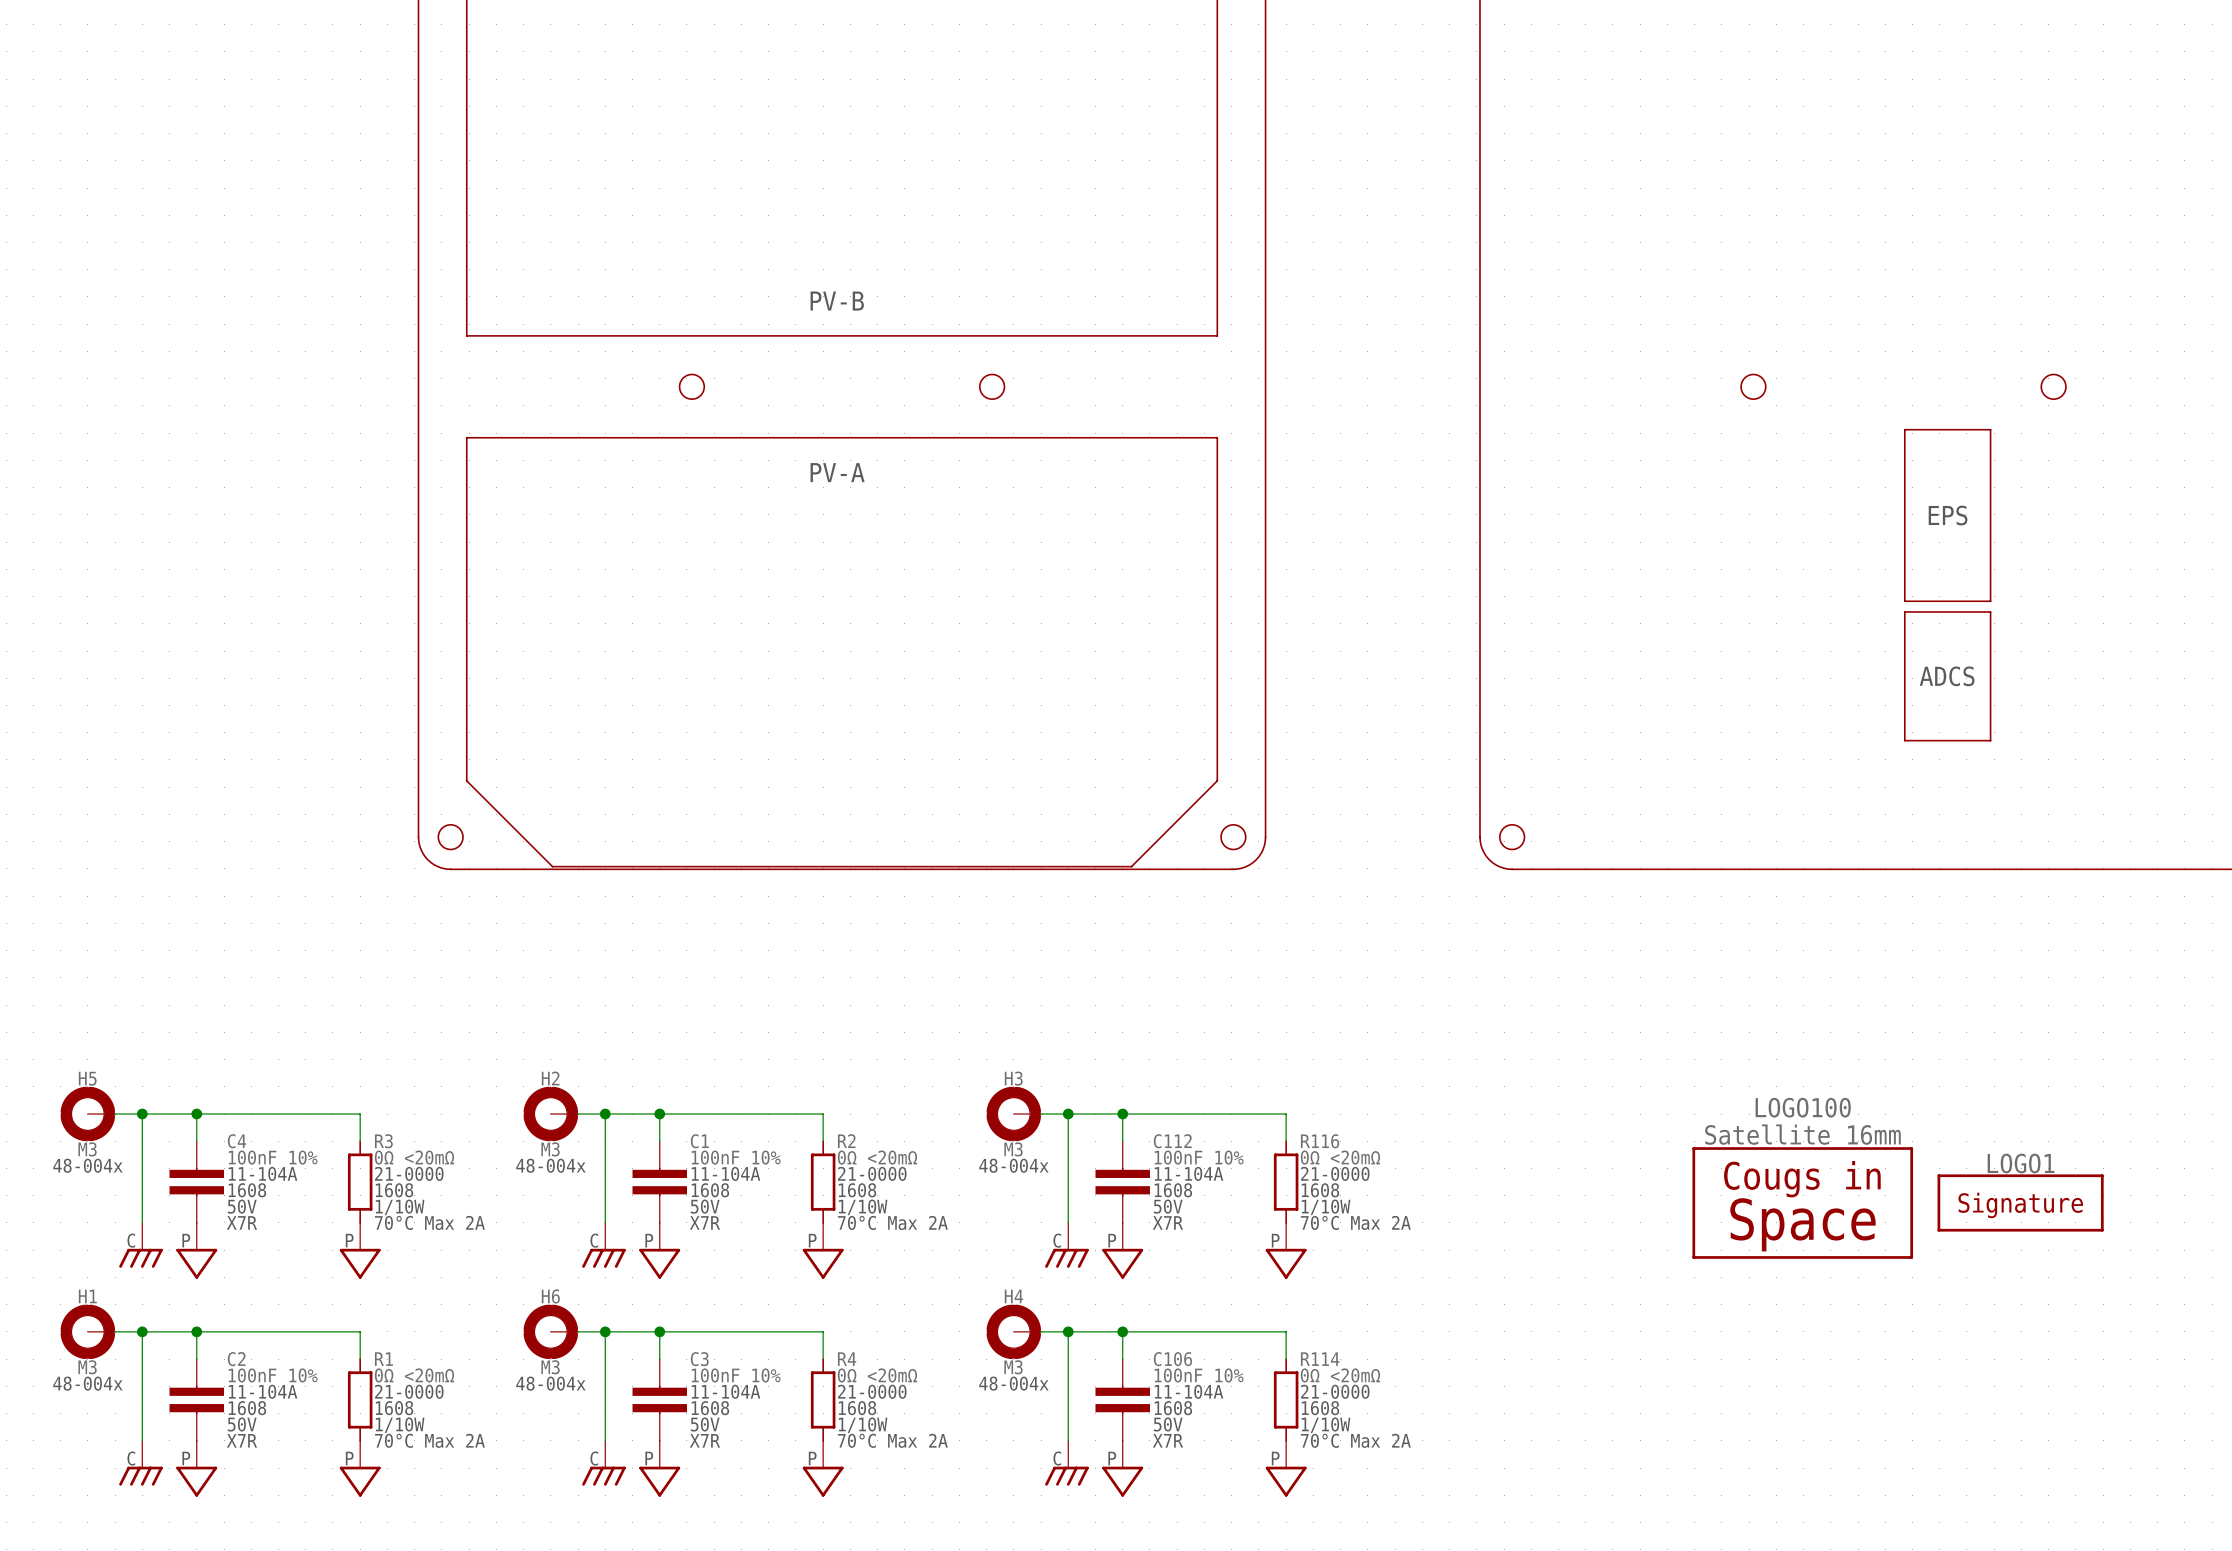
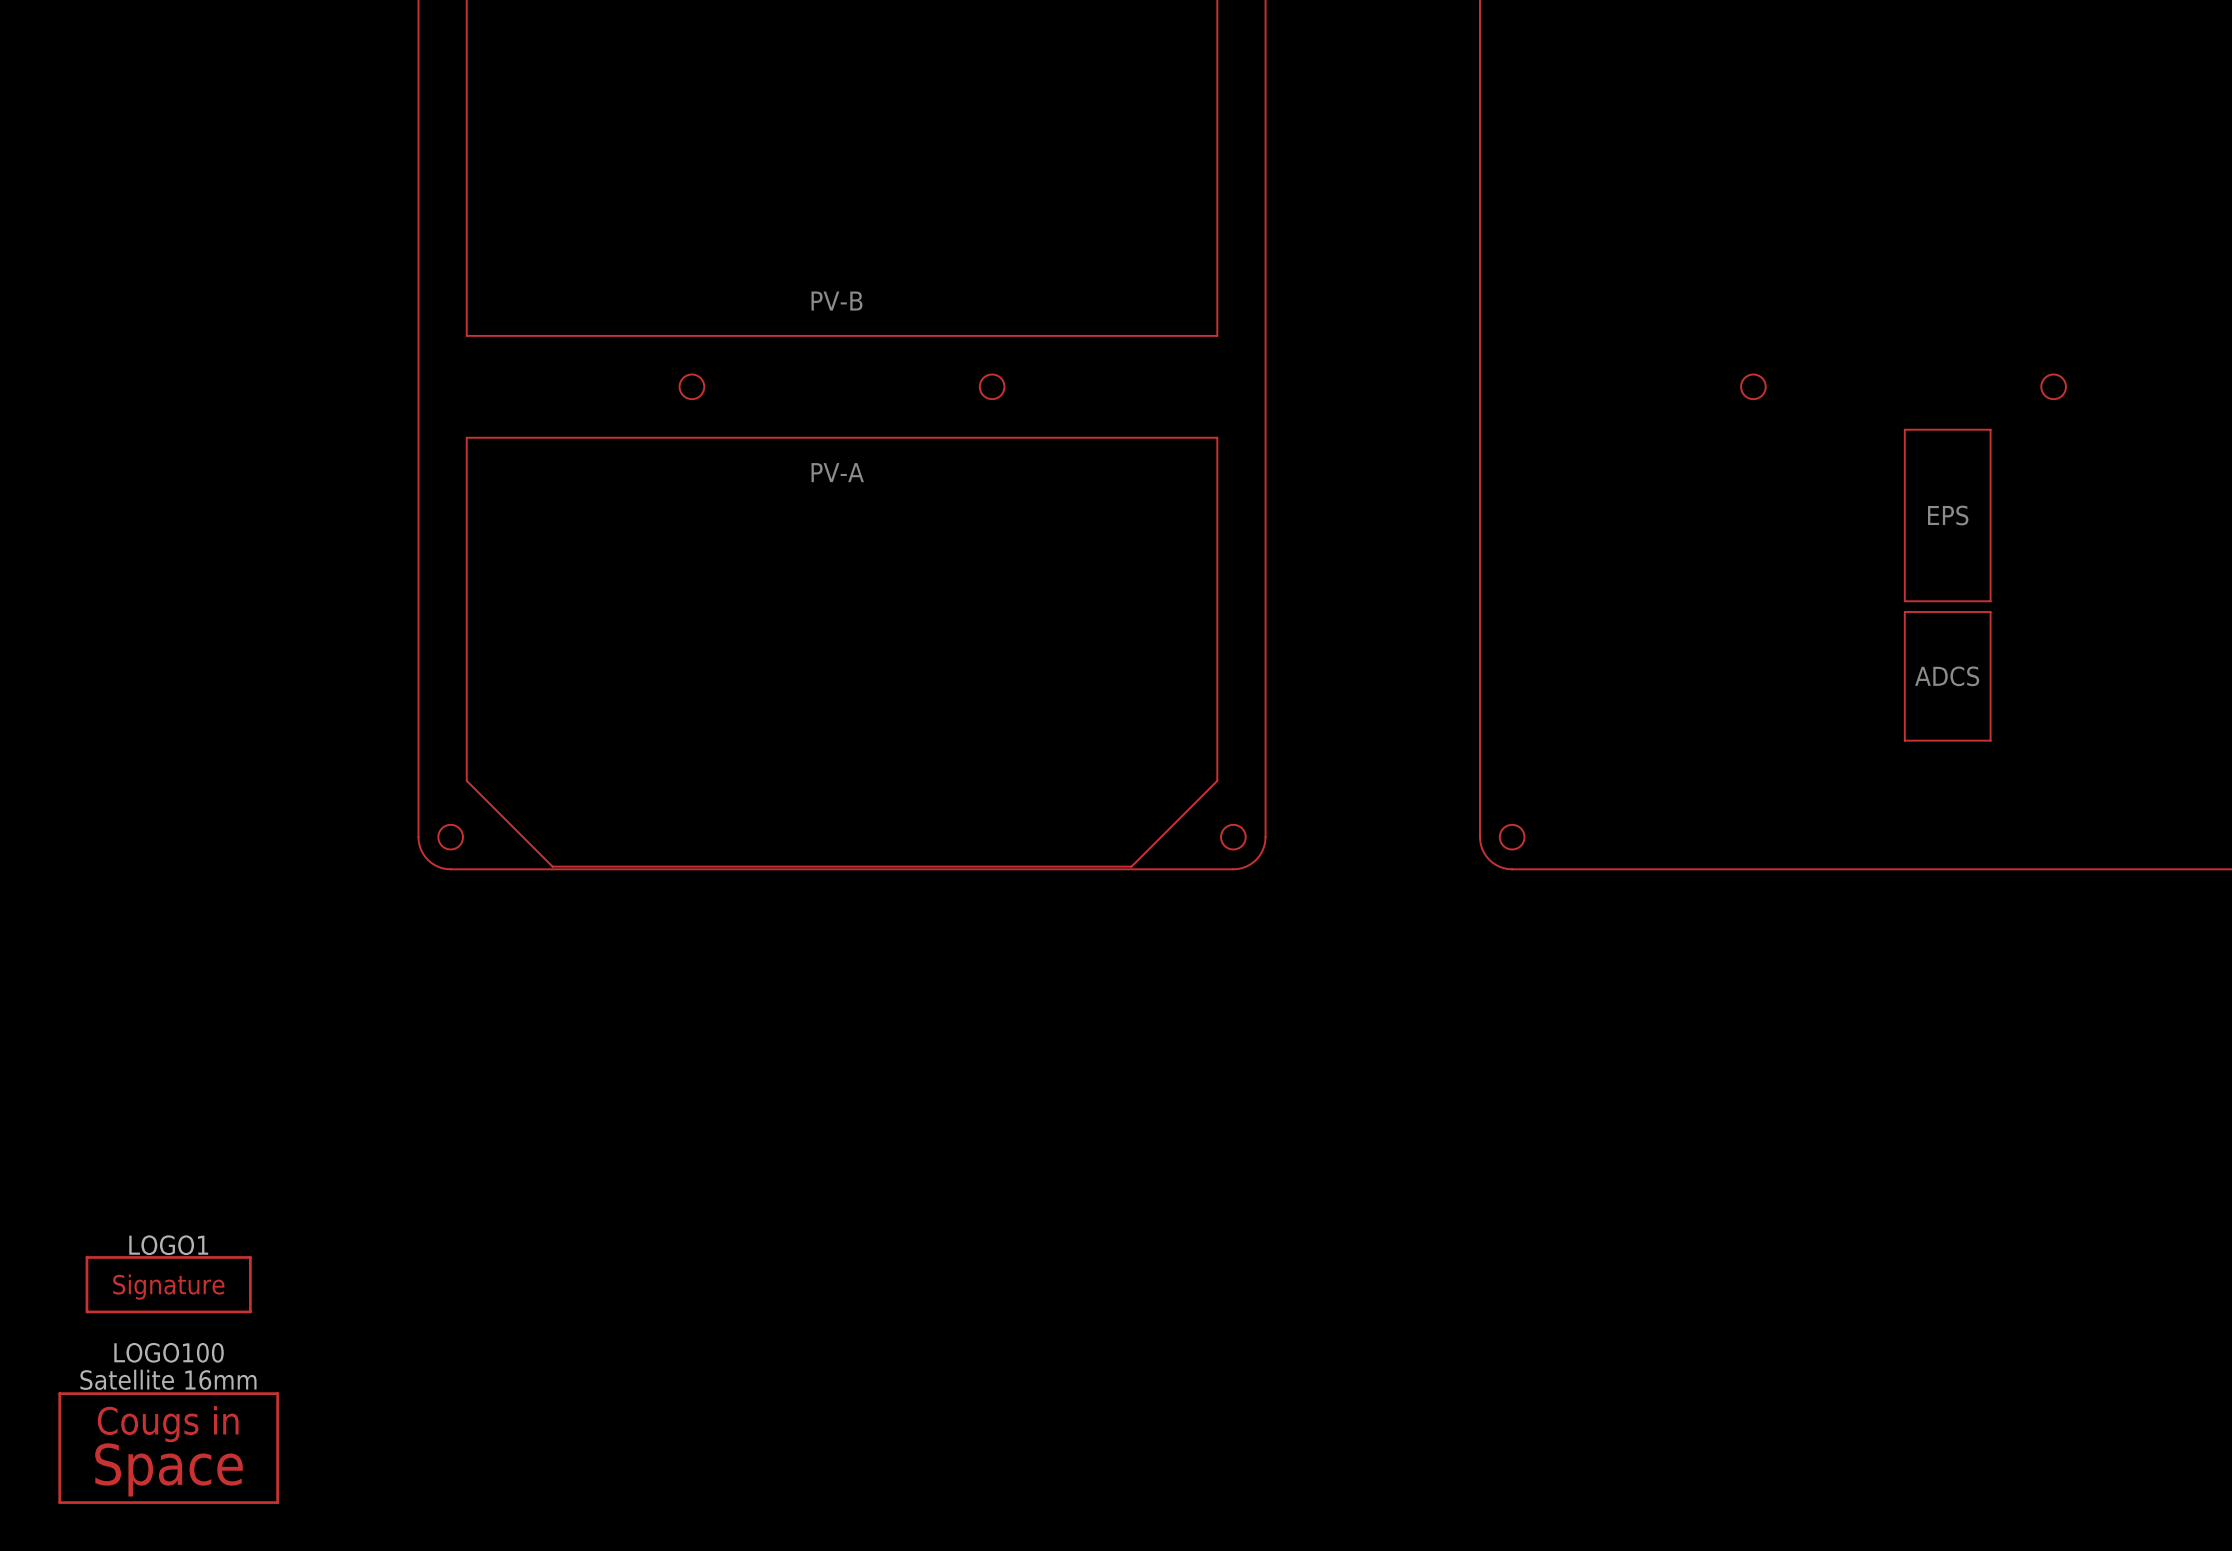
H5: M3 (87, 1114) -> none
wire: (115, 1114) (360, 1114) (360, 1141) -> none
wire: (142, 1114) (142, 1222) -> none
junction: (142, 1114) -> none
wire: (196, 1114) (196, 1141) -> none
junction: (196, 1114) -> none
H2: M3 (550, 1114) -> none
wire: (578, 1114) (823, 1114) (823, 1141) -> none
wire: (605, 1114) (605, 1222) -> none
junction: (605, 1114) -> none
wire: (659, 1114) (659, 1141) -> none
junction: (659, 1114) -> none
H3: M3 (1013, 1114) -> none
wire: (1041, 1114) (1286, 1114) (1286, 1141) -> none
wire: (1068, 1114) (1068, 1222) -> none
junction: (1068, 1114) -> none
wire: (1122, 1114) (1122, 1141) -> none
junction: (1122, 1114) -> none
C4: 100nF 10% (196, 1182) -> none
R3: 0Ω <20mΩ (360, 1182) -> none
C1: 100nF 10% (659, 1182) -> none
R2: 0Ω <20mΩ (823, 1182) -> none
C112: 100nF 10% (1122, 1182) -> none
R116: 0Ω <20mΩ (1286, 1182) -> none
LOGO100 position: (1802, 1202) -> (168, 1448)
LOGO1 position: (2020, 1202) -> (168, 1284)
power symbol: (140, 1245) -> none
power symbol: (603, 1245) -> none
power symbol: (1066, 1245) -> none
power symbol: (196, 1250) -> none
power symbol: (360, 1250) -> none
power symbol: (659, 1250) -> none
power symbol: (823, 1250) -> none
power symbol: (1122, 1250) -> none
power symbol: (1286, 1250) -> none
H1: M3 (87, 1331) -> none
wire: (115, 1331) (360, 1331) (360, 1359) -> none
wire: (142, 1331) (142, 1440) -> none
junction: (142, 1331) -> none
wire: (196, 1331) (196, 1359) -> none
junction: (196, 1331) -> none
H6: M3 (550, 1331) -> none
wire: (578, 1331) (823, 1331) (823, 1359) -> none
wire: (605, 1331) (605, 1440) -> none
junction: (605, 1331) -> none
wire: (659, 1331) (659, 1359) -> none
junction: (659, 1331) -> none
H4: M3 (1013, 1331) -> none
wire: (1041, 1331) (1286, 1331) (1286, 1359) -> none
wire: (1068, 1331) (1068, 1440) -> none
junction: (1068, 1331) -> none
wire: (1122, 1331) (1122, 1359) -> none
junction: (1122, 1331) -> none
C2: 100nF 10% (196, 1399) -> none
R1: 0Ω <20mΩ (360, 1399) -> none
C3: 100nF 10% (659, 1399) -> none
R4: 0Ω <20mΩ (823, 1399) -> none
C106: 100nF 10% (1122, 1399) -> none
R114: 0Ω <20mΩ (1286, 1399) -> none
power symbol: (140, 1463) -> none
power symbol: (603, 1463) -> none
power symbol: (1066, 1463) -> none
power symbol: (196, 1468) -> none
power symbol: (360, 1468) -> none
power symbol: (659, 1468) -> none
power symbol: (823, 1468) -> none
power symbol: (1122, 1468) -> none
power symbol: (1286, 1468) -> none

